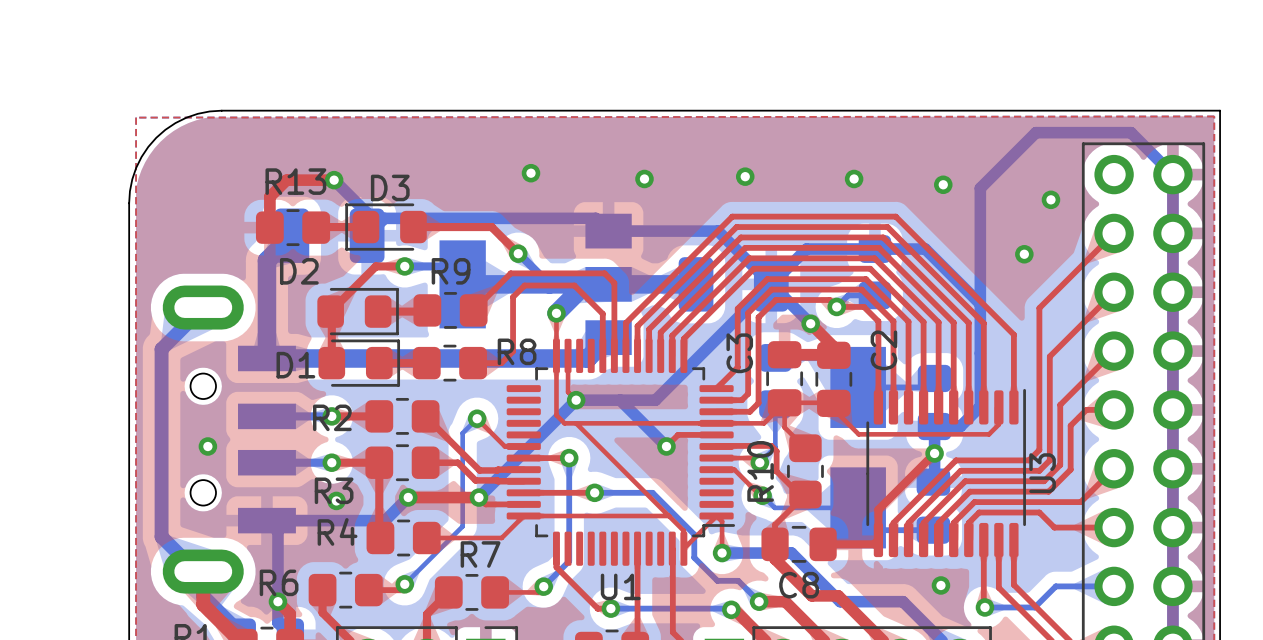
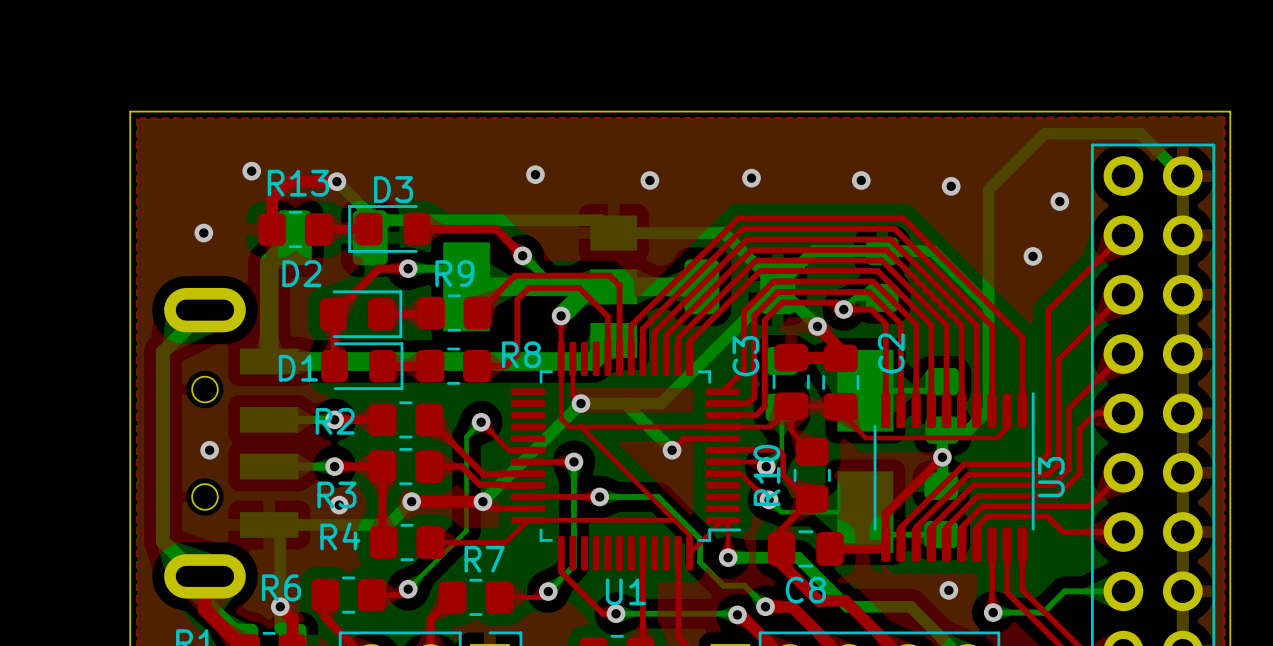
board edge: (221, 110) (197, 113) (186, 117) (165, 129) (156, 137) (141, 156) (136, 167) (129, 191) (129, 203) -> (223, 111) (130, 111) (130, 205)
via: none -> (251, 171)
via: none -> (203, 233)

